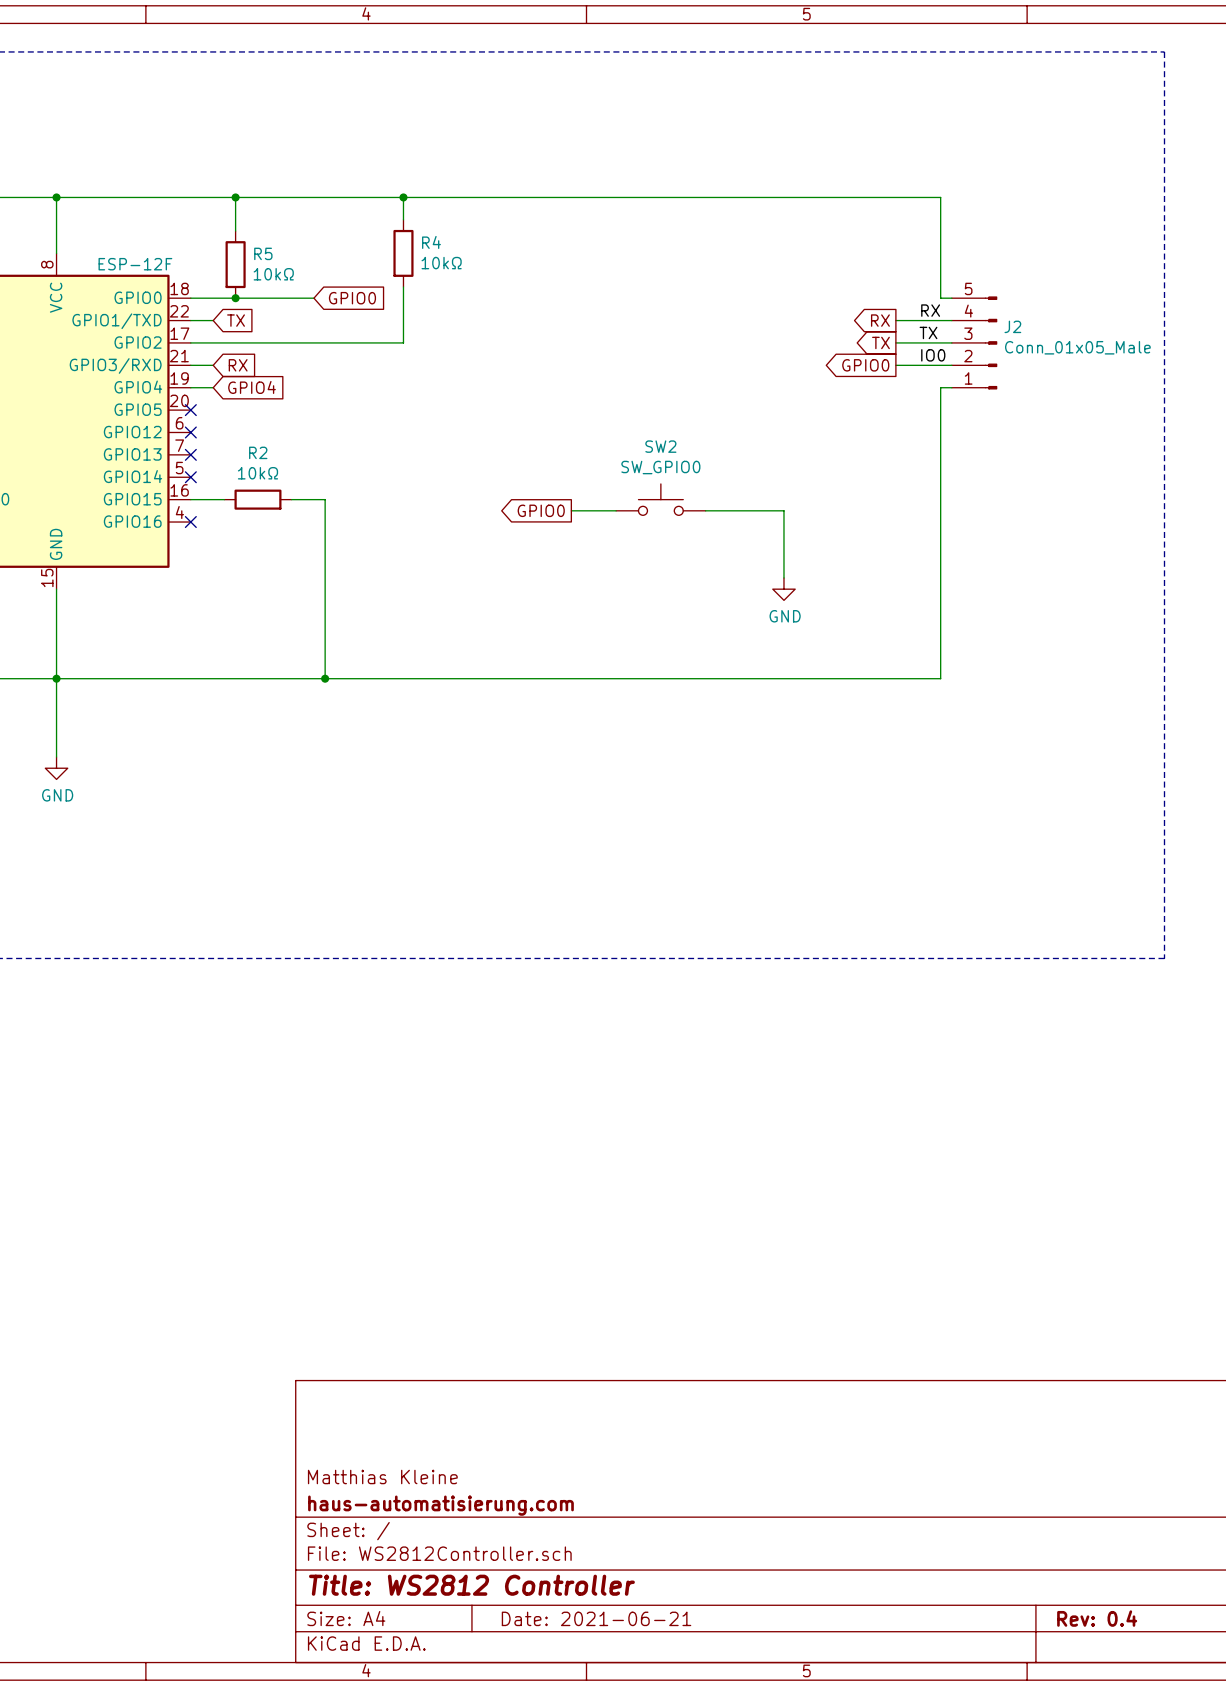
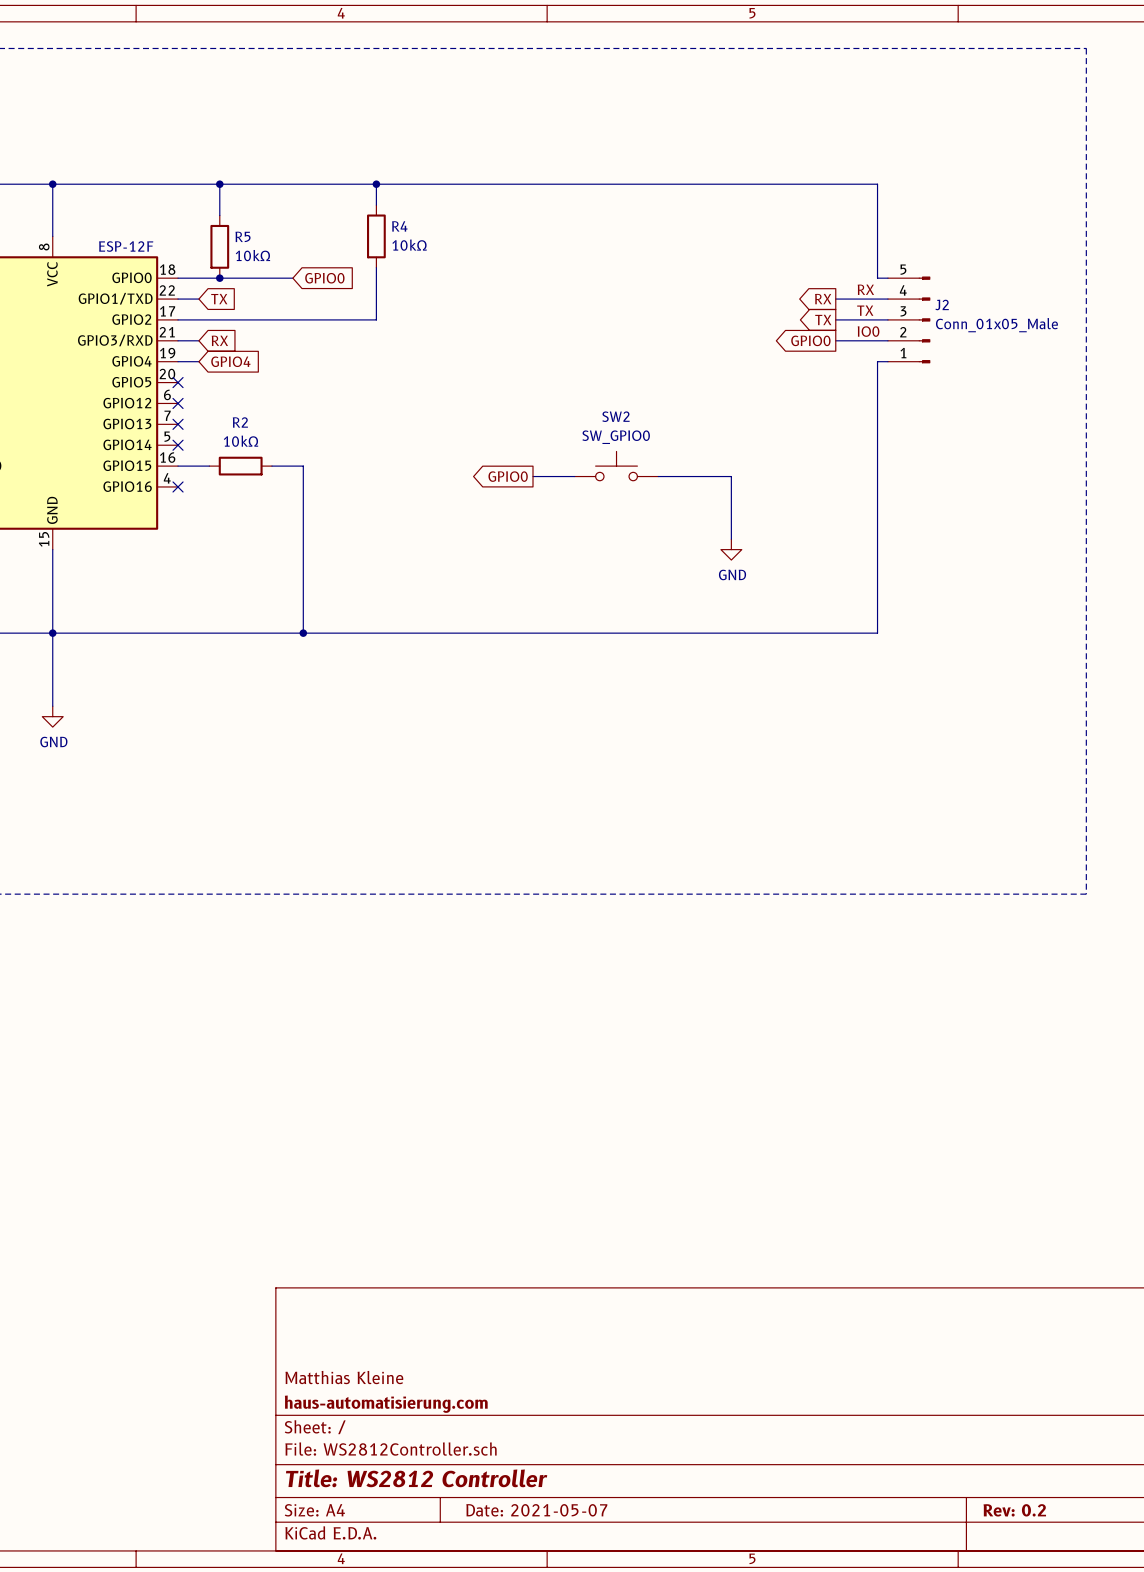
title block: Date: 2021-06-21 (596, 1618) -> Date: 2021-05-07 (536, 1510)
title block: Rev: 0.4 (1097, 1618) -> Rev: 0.2 (1014, 1510)

